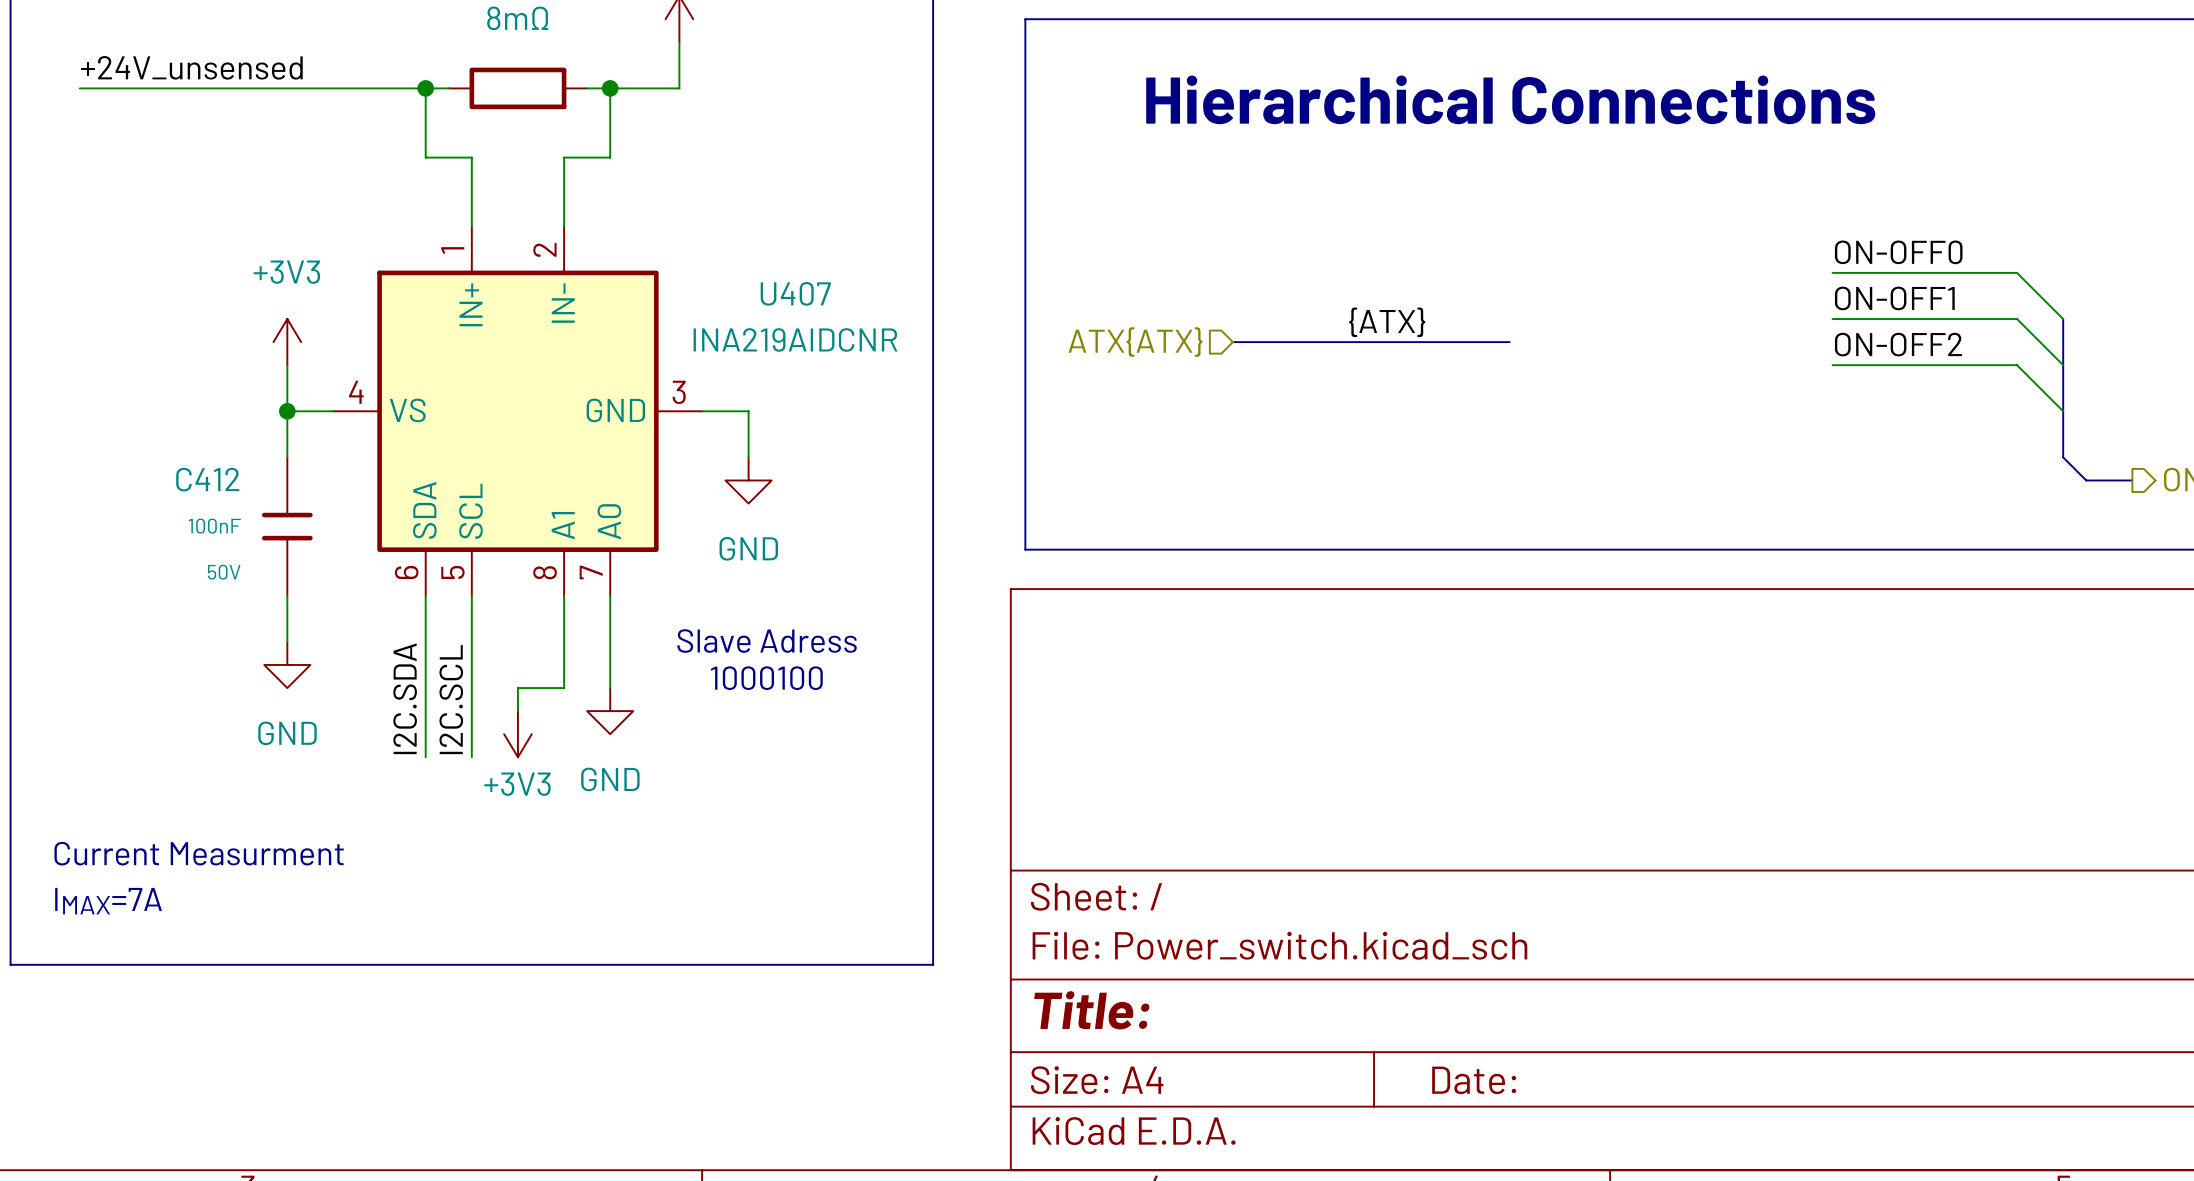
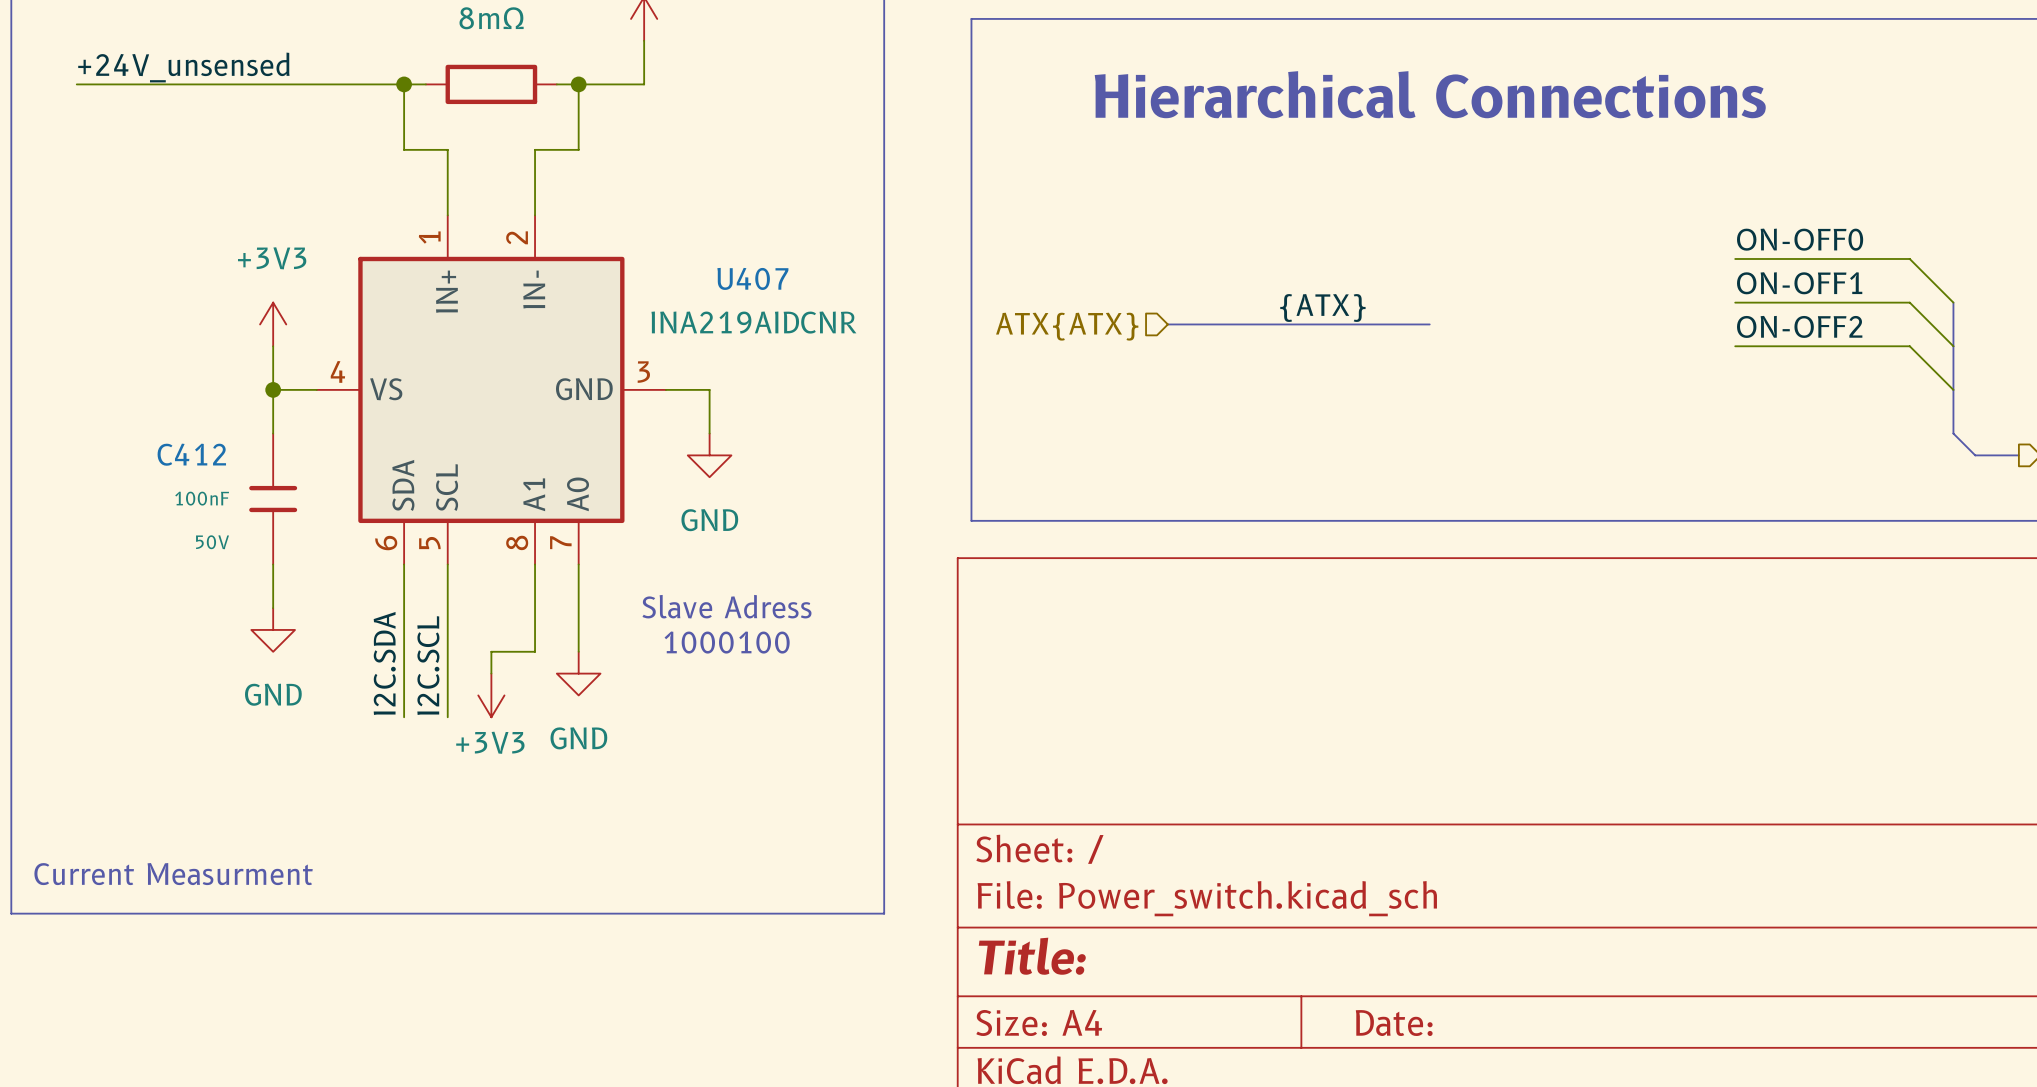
text position: Current Measurment (199, 853) -> Current Measurment (173, 874)
text: IMAX=7A (108, 901) -> none

